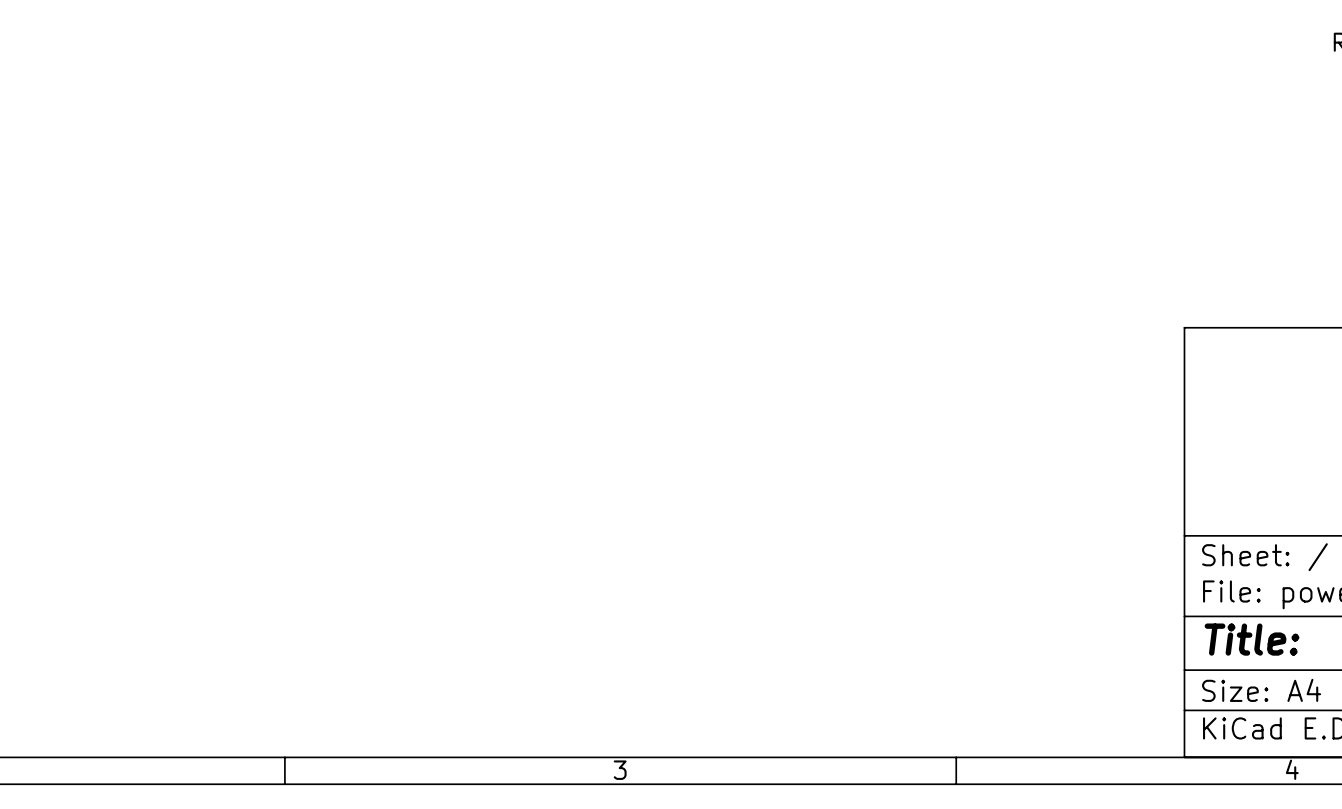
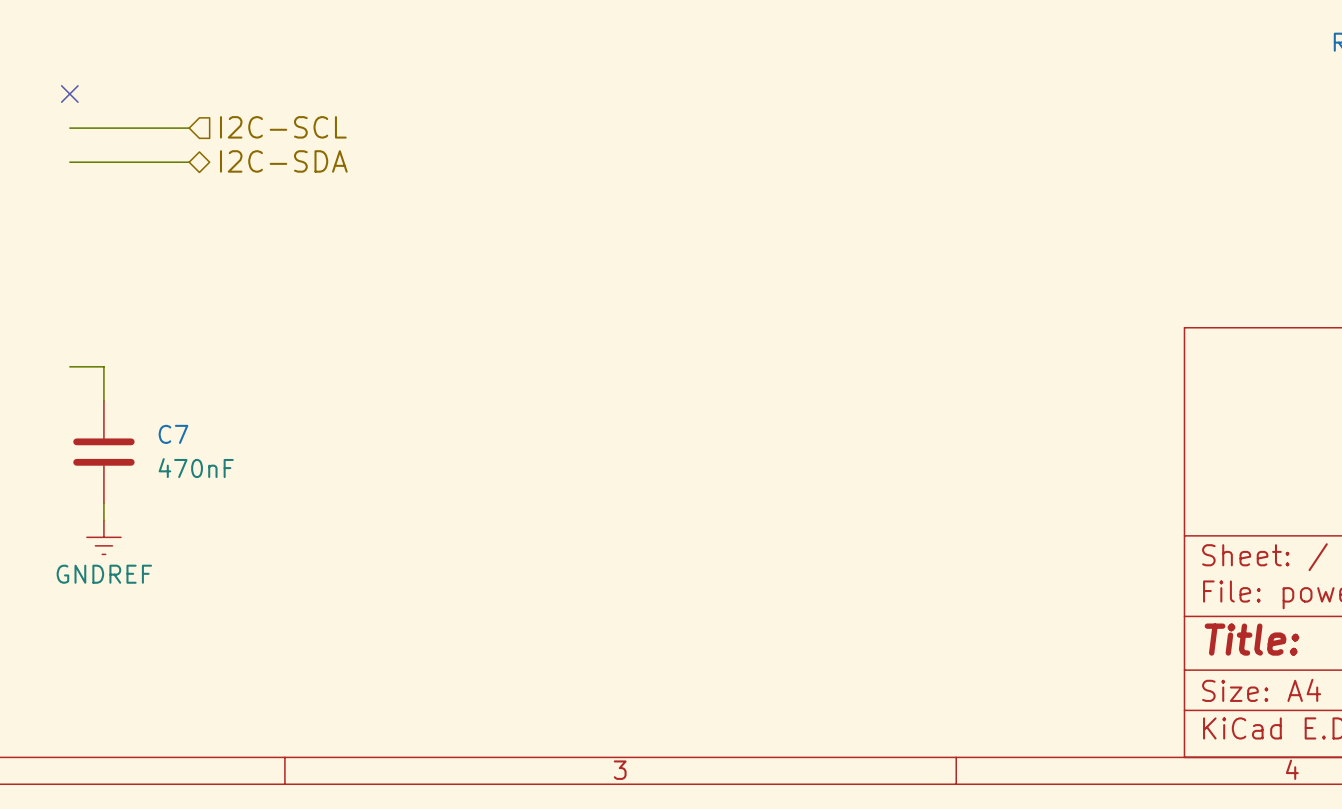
no-connect mark: none -> (69, 94)
hierarchical label: none -> I2C-SCL (283, 127)
wire: none -> (69, 128) (189, 128)
hierarchical label: none -> I2C-SDA (283, 161)
wire: none -> (69, 162) (189, 162)
wire: none -> (69, 366) (103, 366) (103, 400)
C7: none -> 470nF (103, 452)
wire: none -> (103, 503) (103, 520)
power symbol: none -> GNDREF (103, 537)

